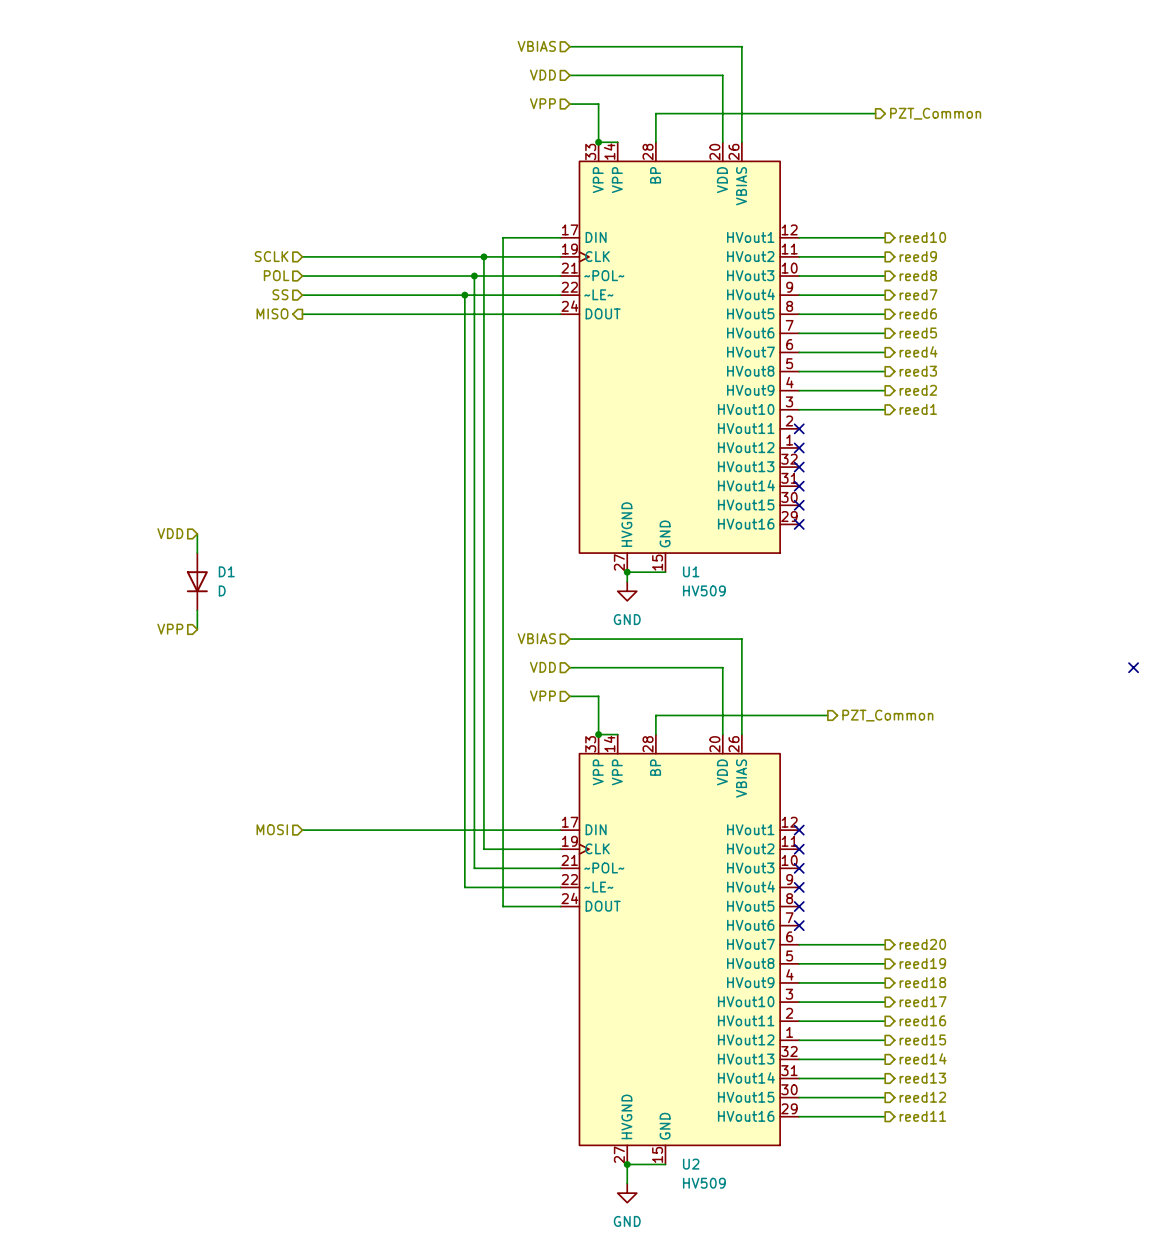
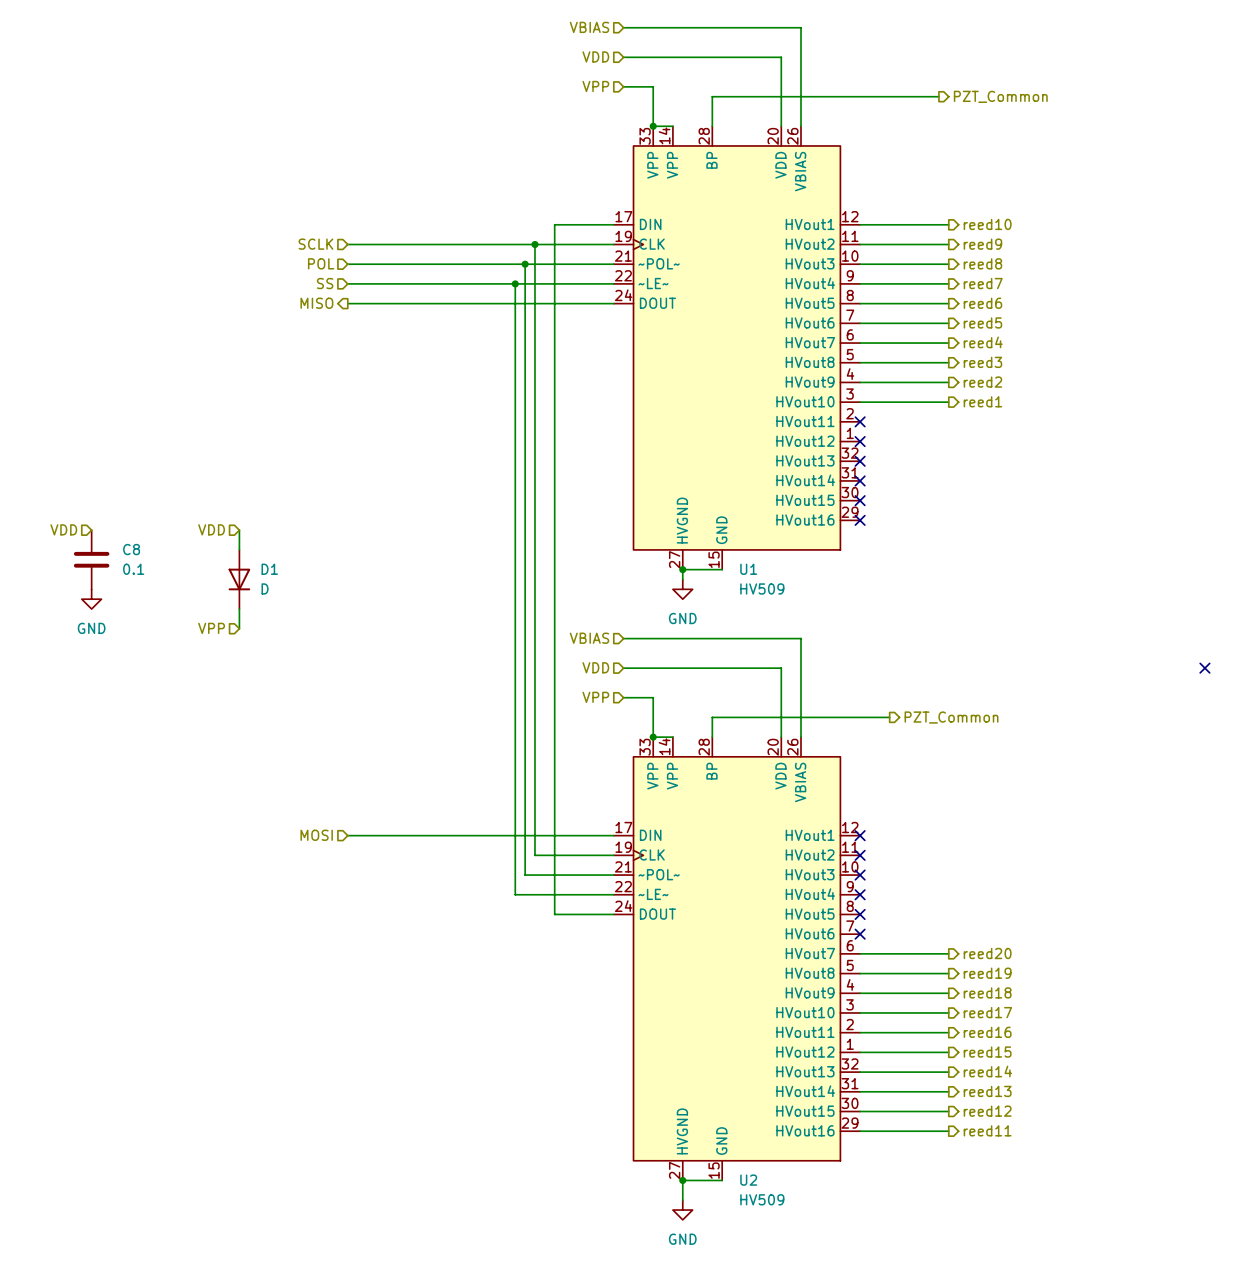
hierarchical label: none -> VDD (63, 529)
C8: none -> 0.1 (91, 559)
power symbol: none -> GND (91, 599)

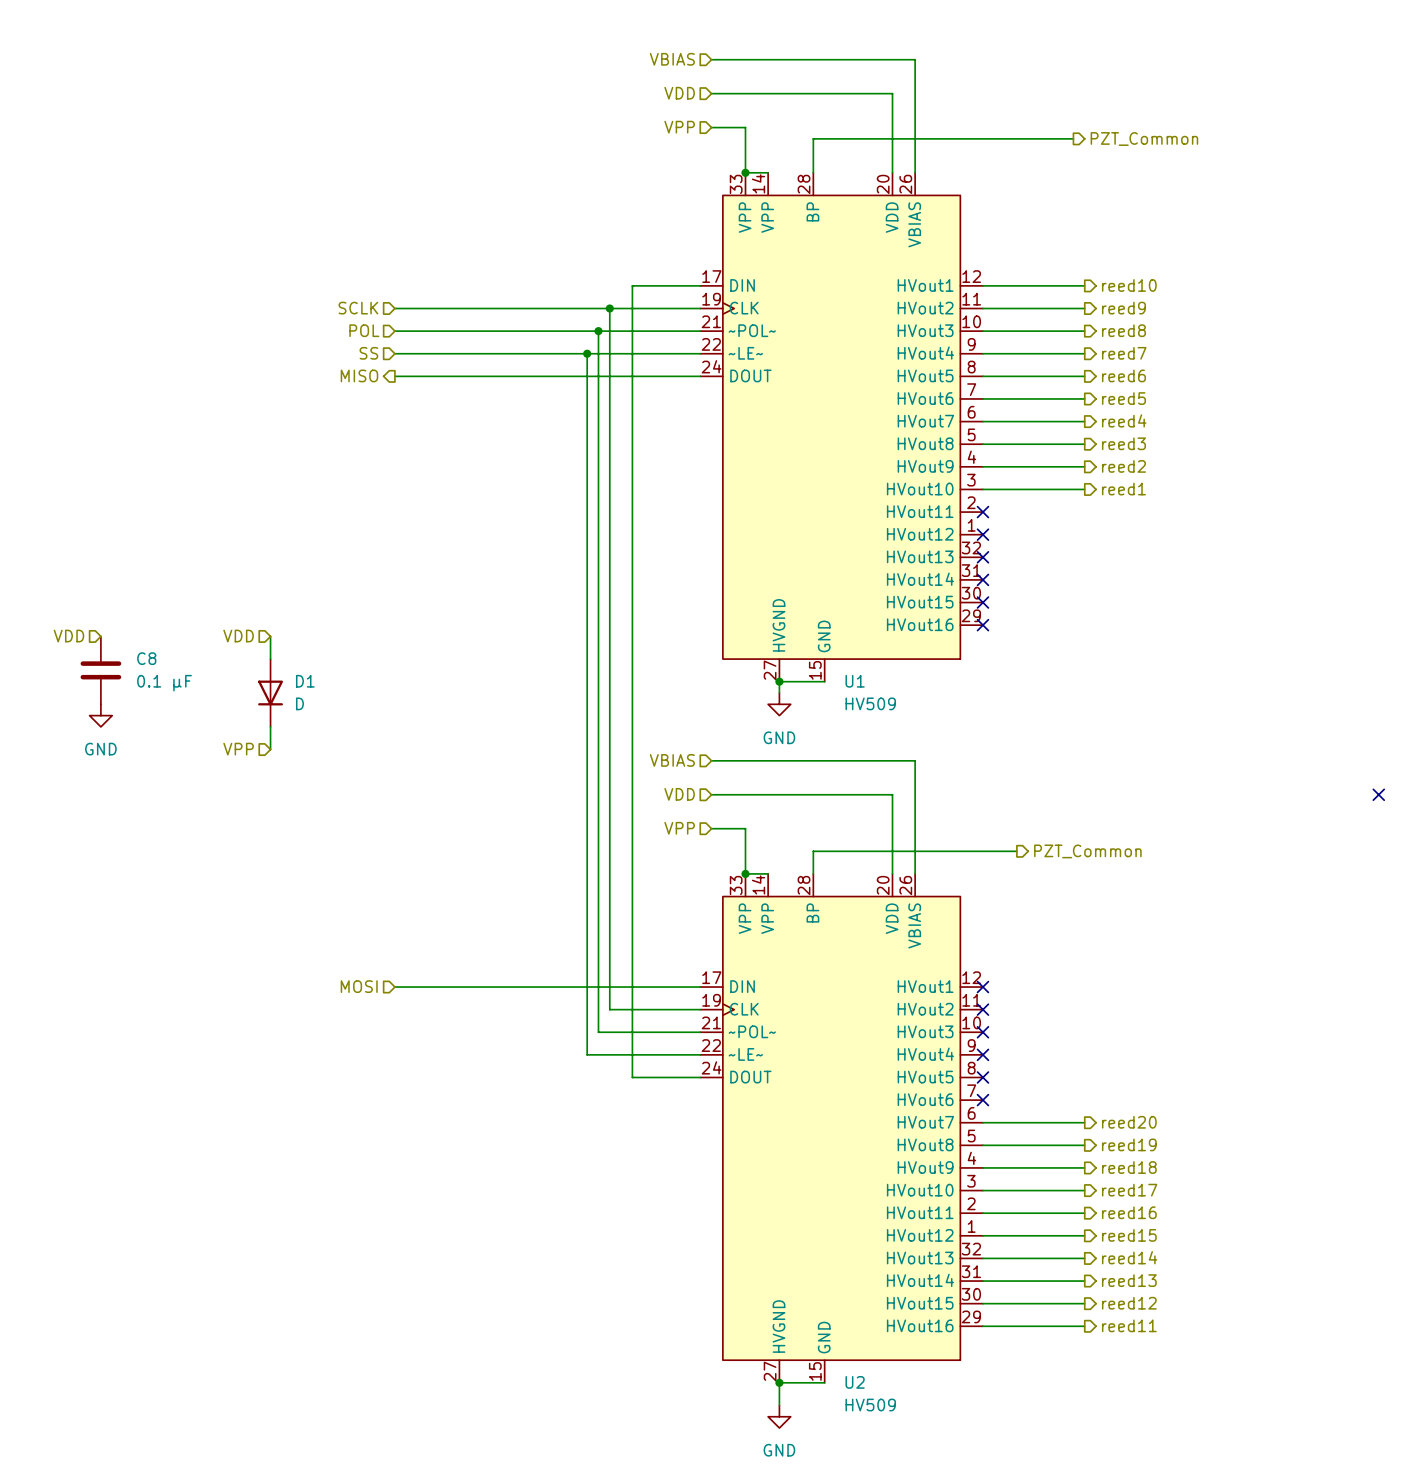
C8 value: 0.1 (133, 569) -> 0.1 µF (164, 683)

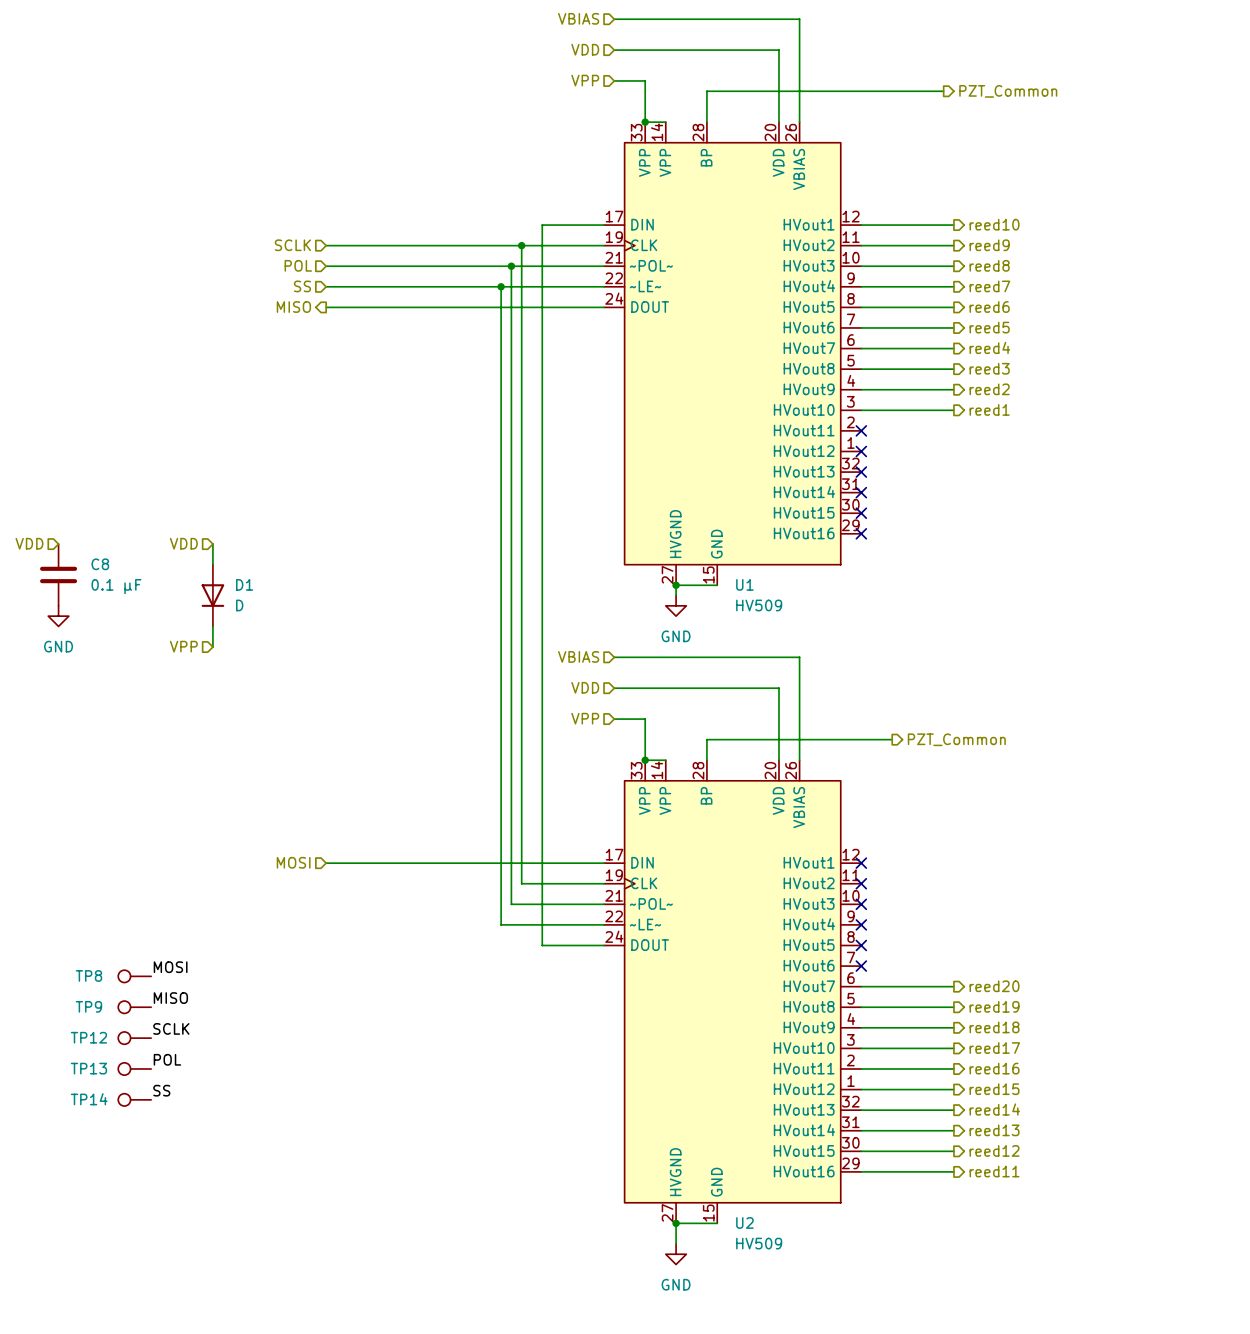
no-connect mark: (1378, 794) -> none
label: none -> MOSI (170, 967)
TP8: none -> (134, 976)
label: none -> MISO (170, 998)
TP9: none -> (134, 1007)
label: none -> SCLK (171, 1028)
TP12: none -> (134, 1038)
label: none -> POL (167, 1059)
TP13: none -> (134, 1068)
label: none -> SS (161, 1090)
TP14: none -> (134, 1099)

